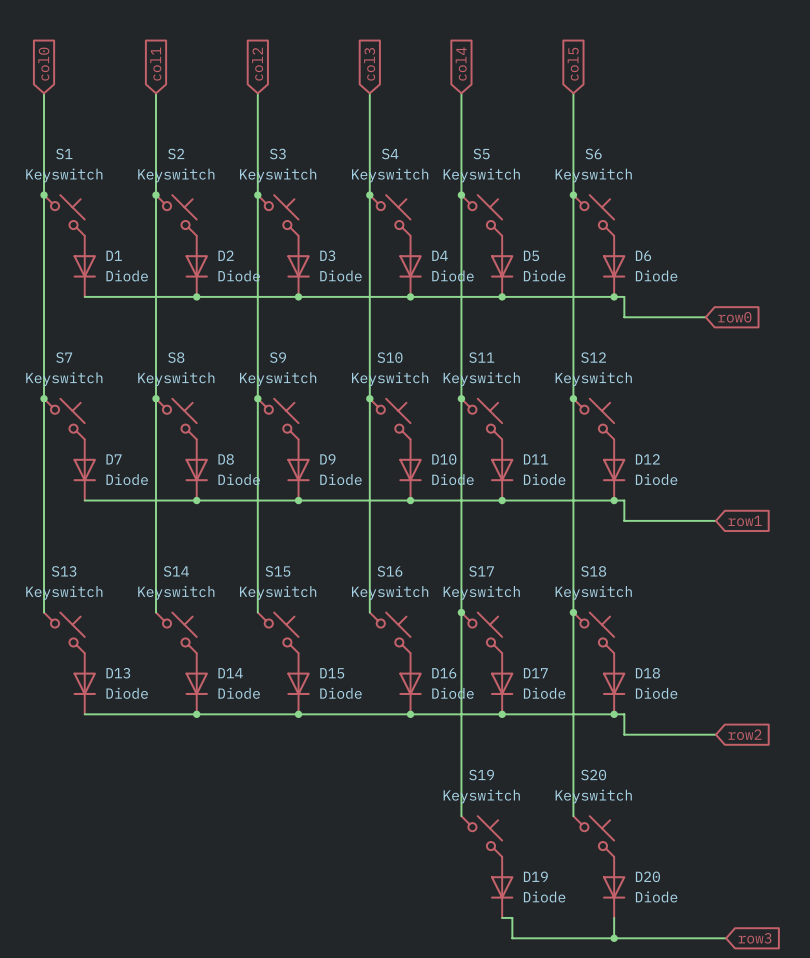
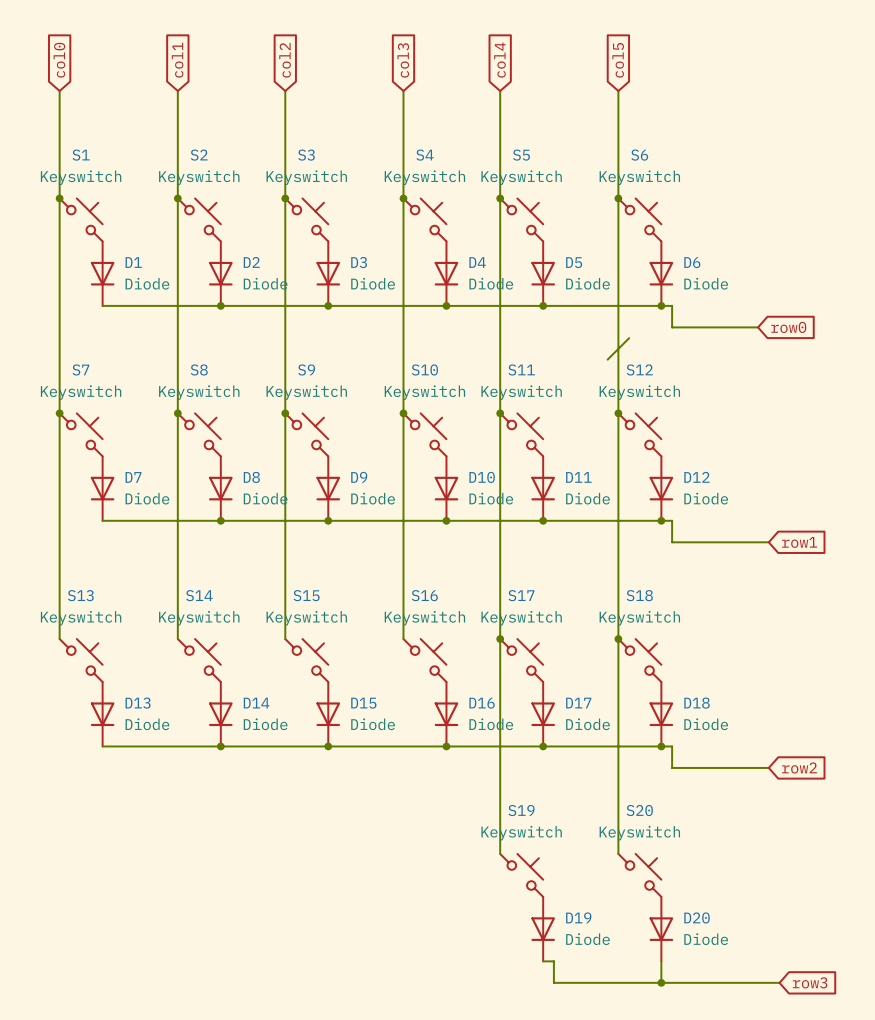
wire: none -> (629, 338) (607, 359)

